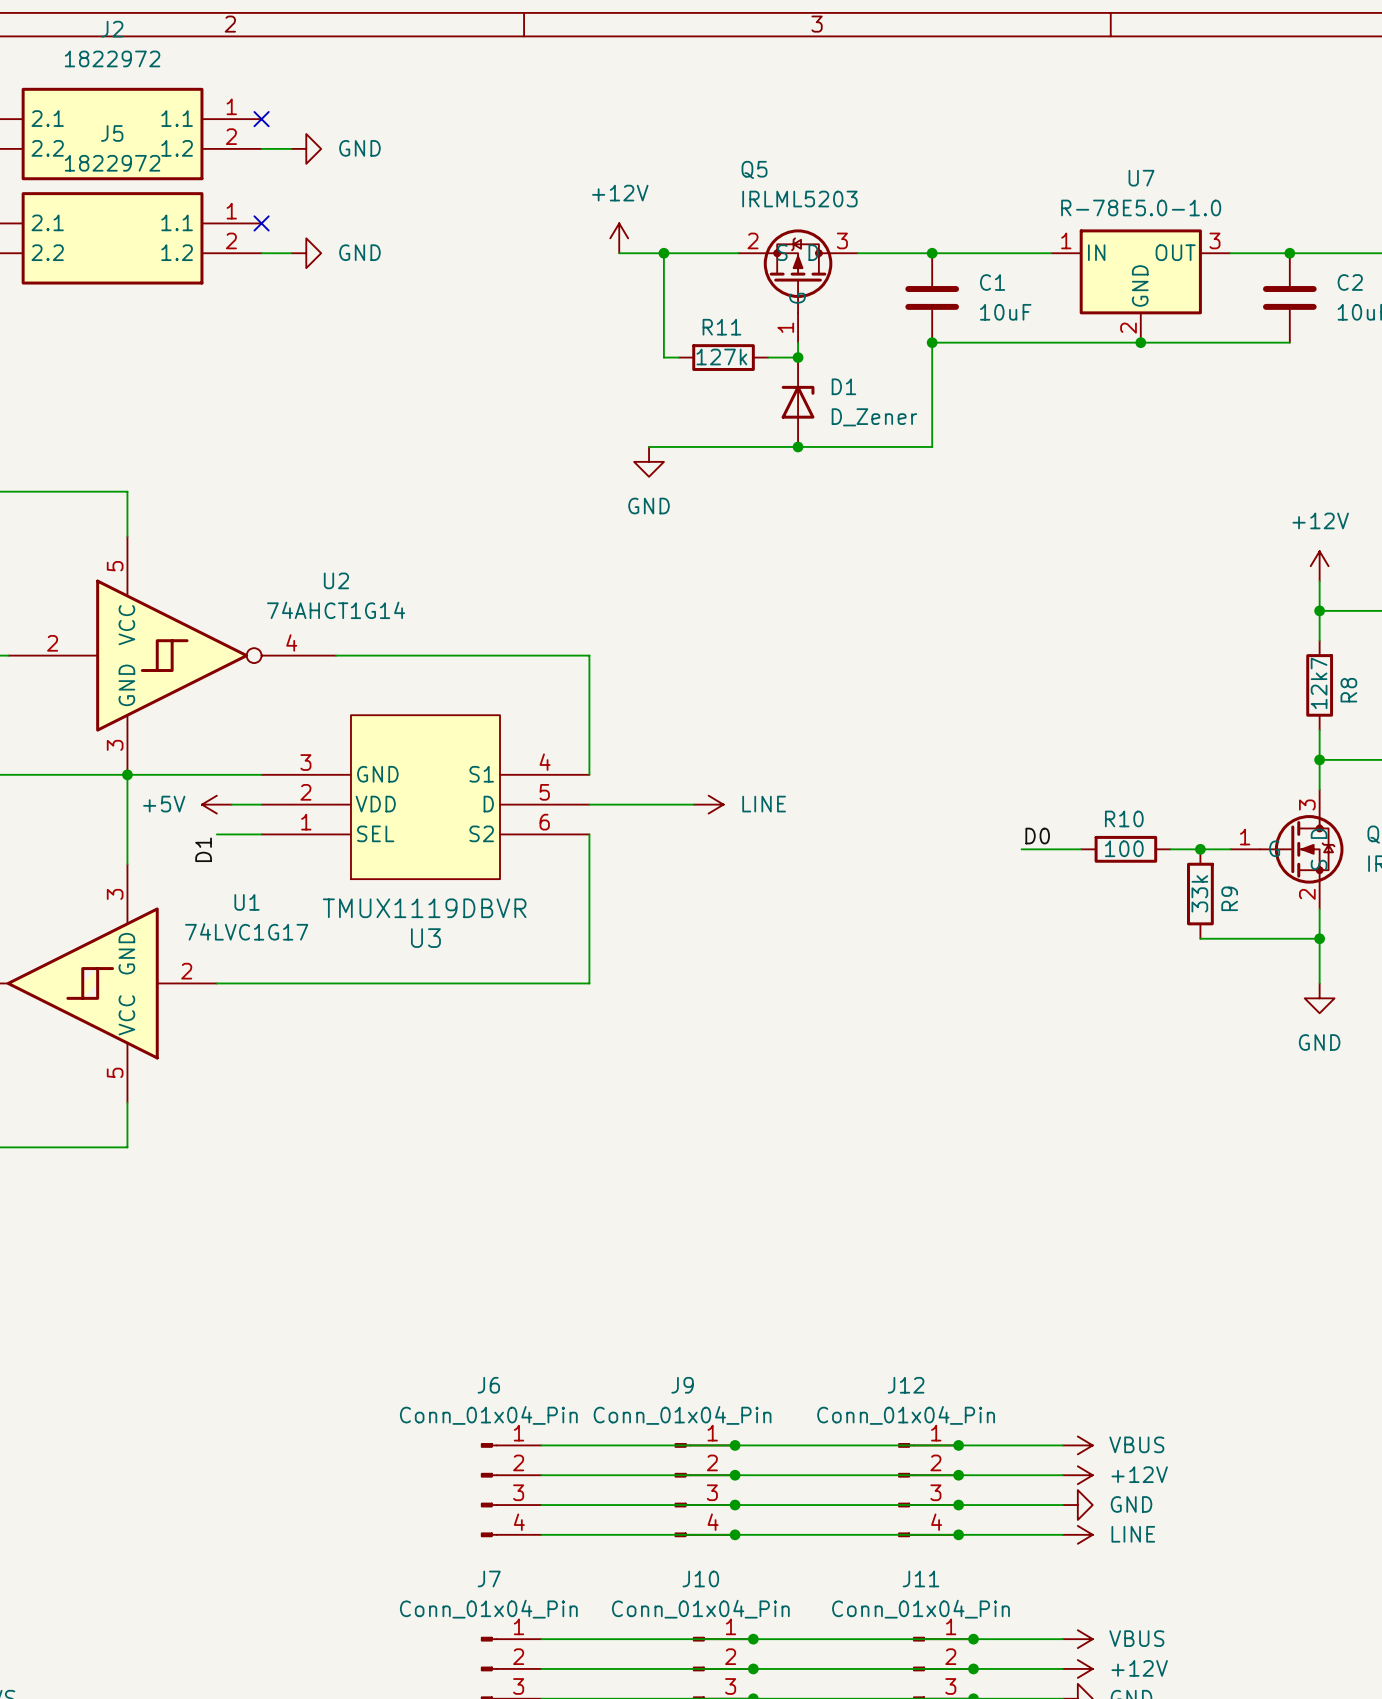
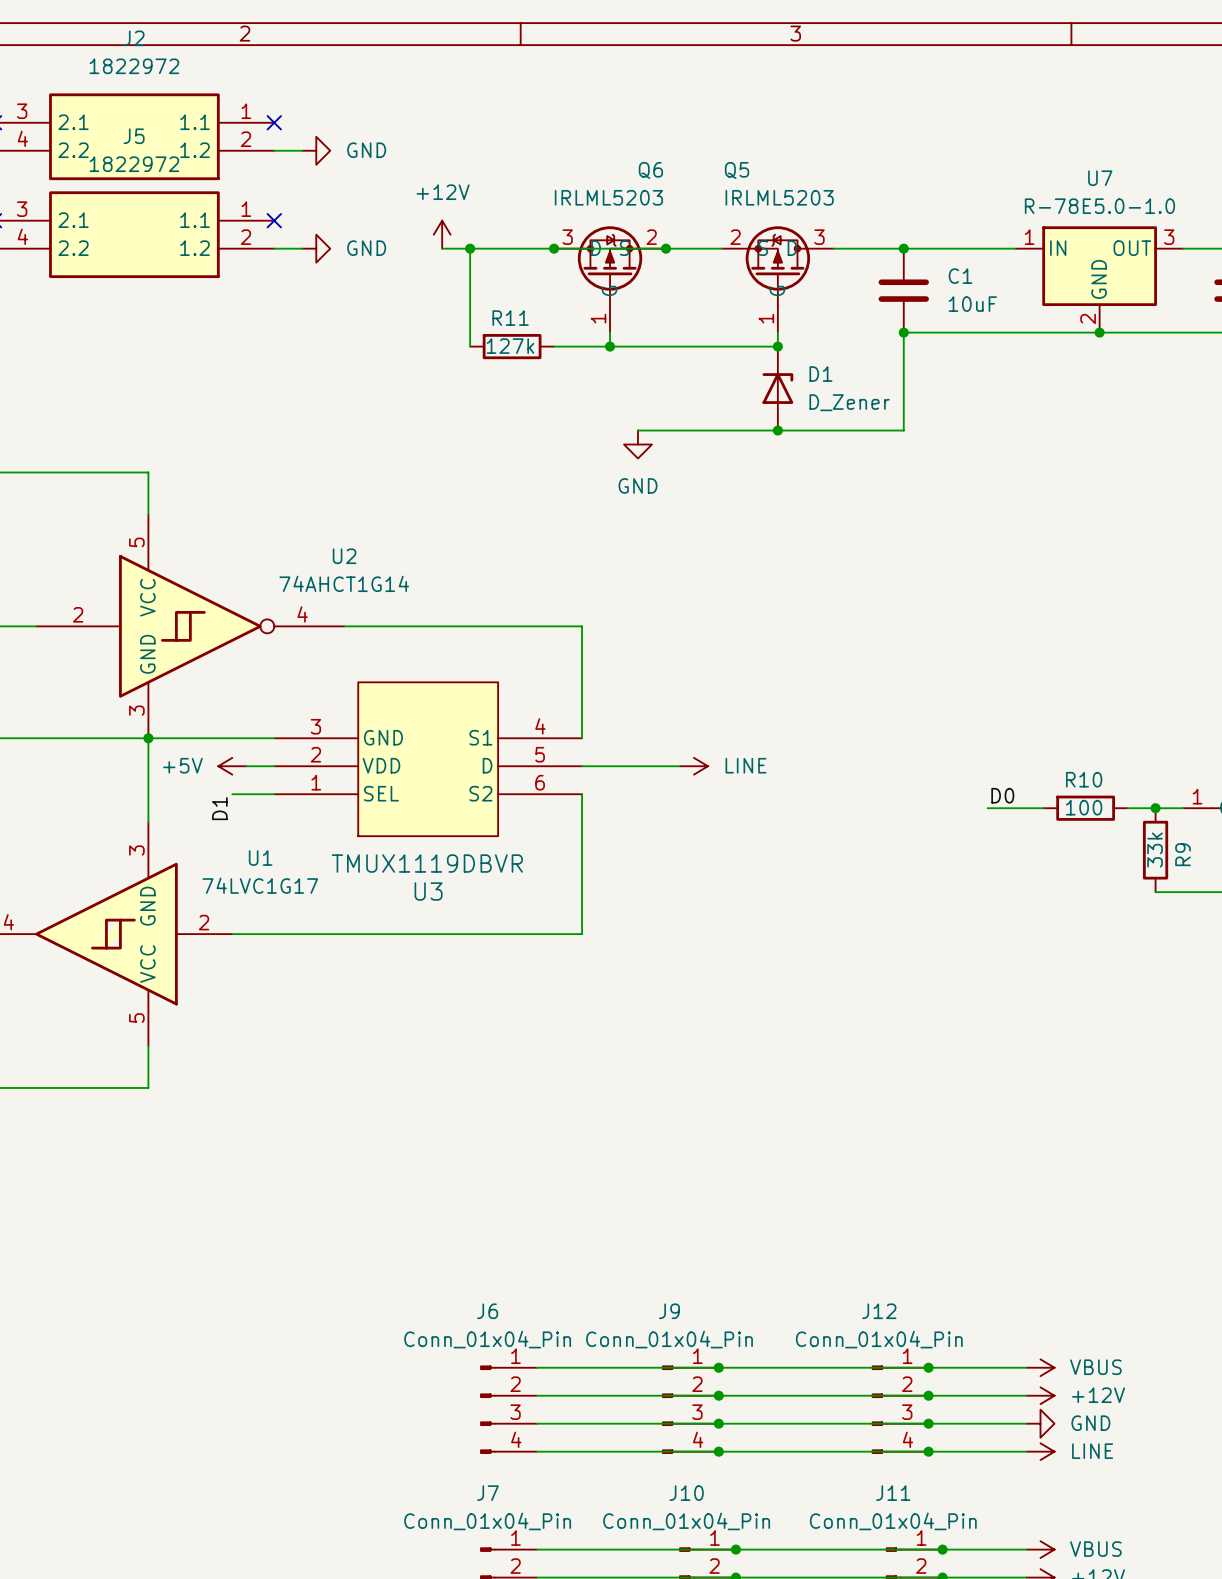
power symbol position: +12V (619, 238) -> +12V (442, 234)
wire: none -> (442, 248) (610, 248)
wire: none -> (470, 248) (470, 346)
junction: none -> (470, 248)
junction: none -> (554, 248)
wire: (663, 253) (663, 357) -> (554, 346) (651, 346)
junction position: (663, 253) -> (665, 248)
Q6: none -> IRLML5203 (610, 279)
wire: none -> (610, 332) (610, 346)
junction: none -> (610, 346)
wire: none -> (665, 346) (749, 346)
R11 position: (723, 357) -> (512, 346)

